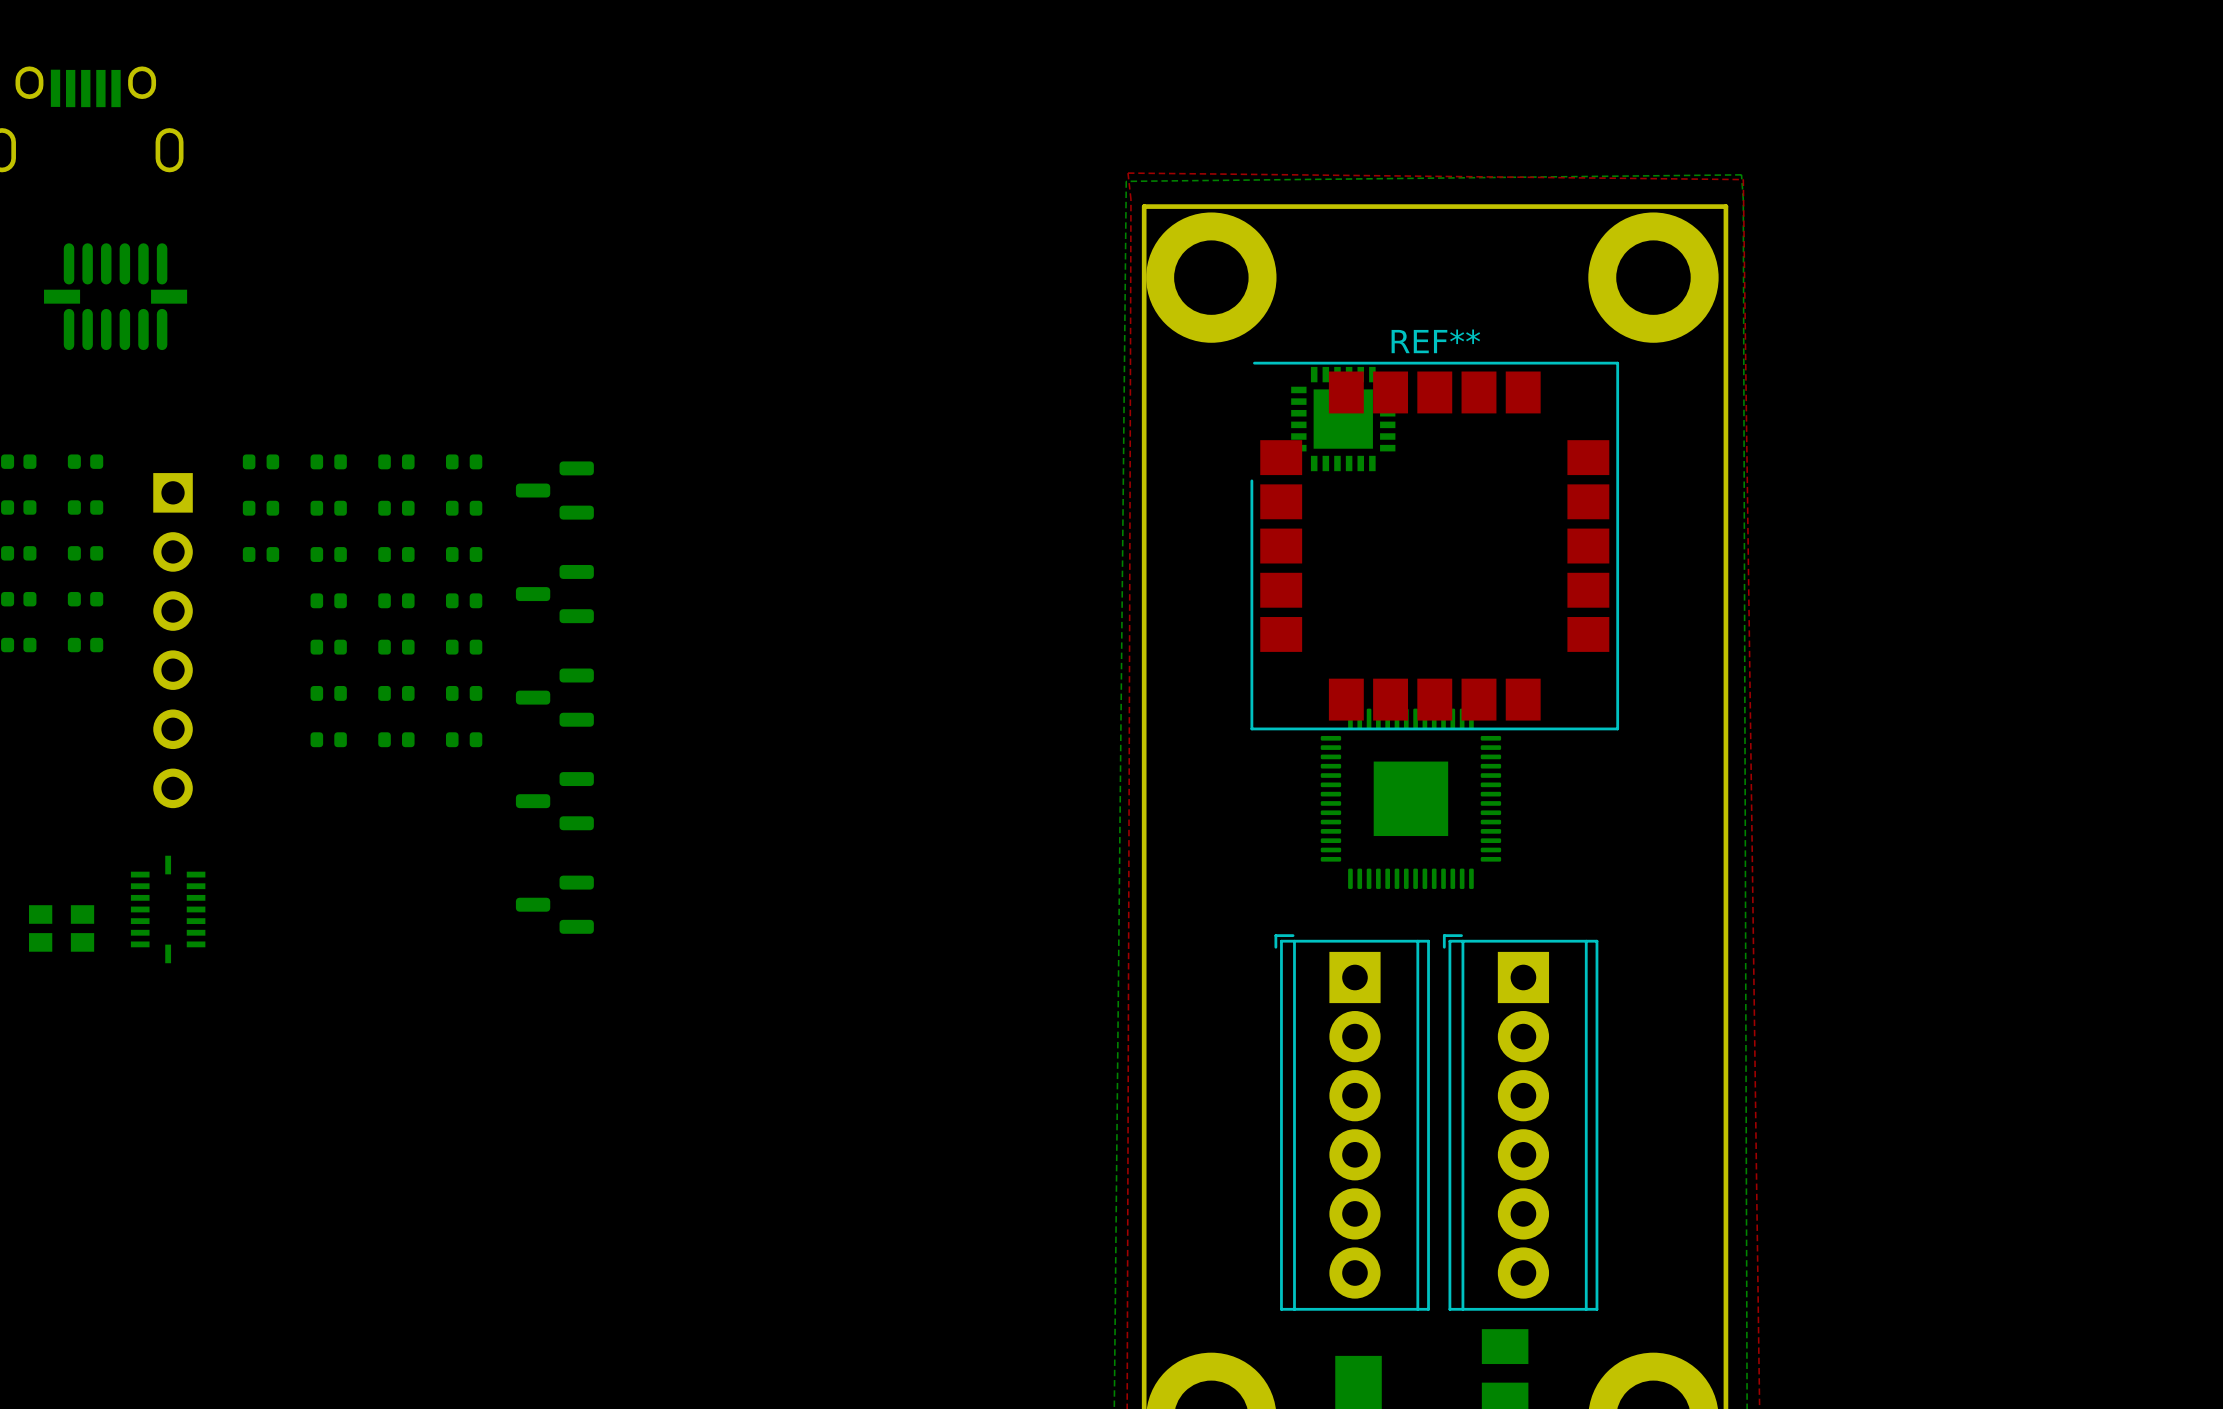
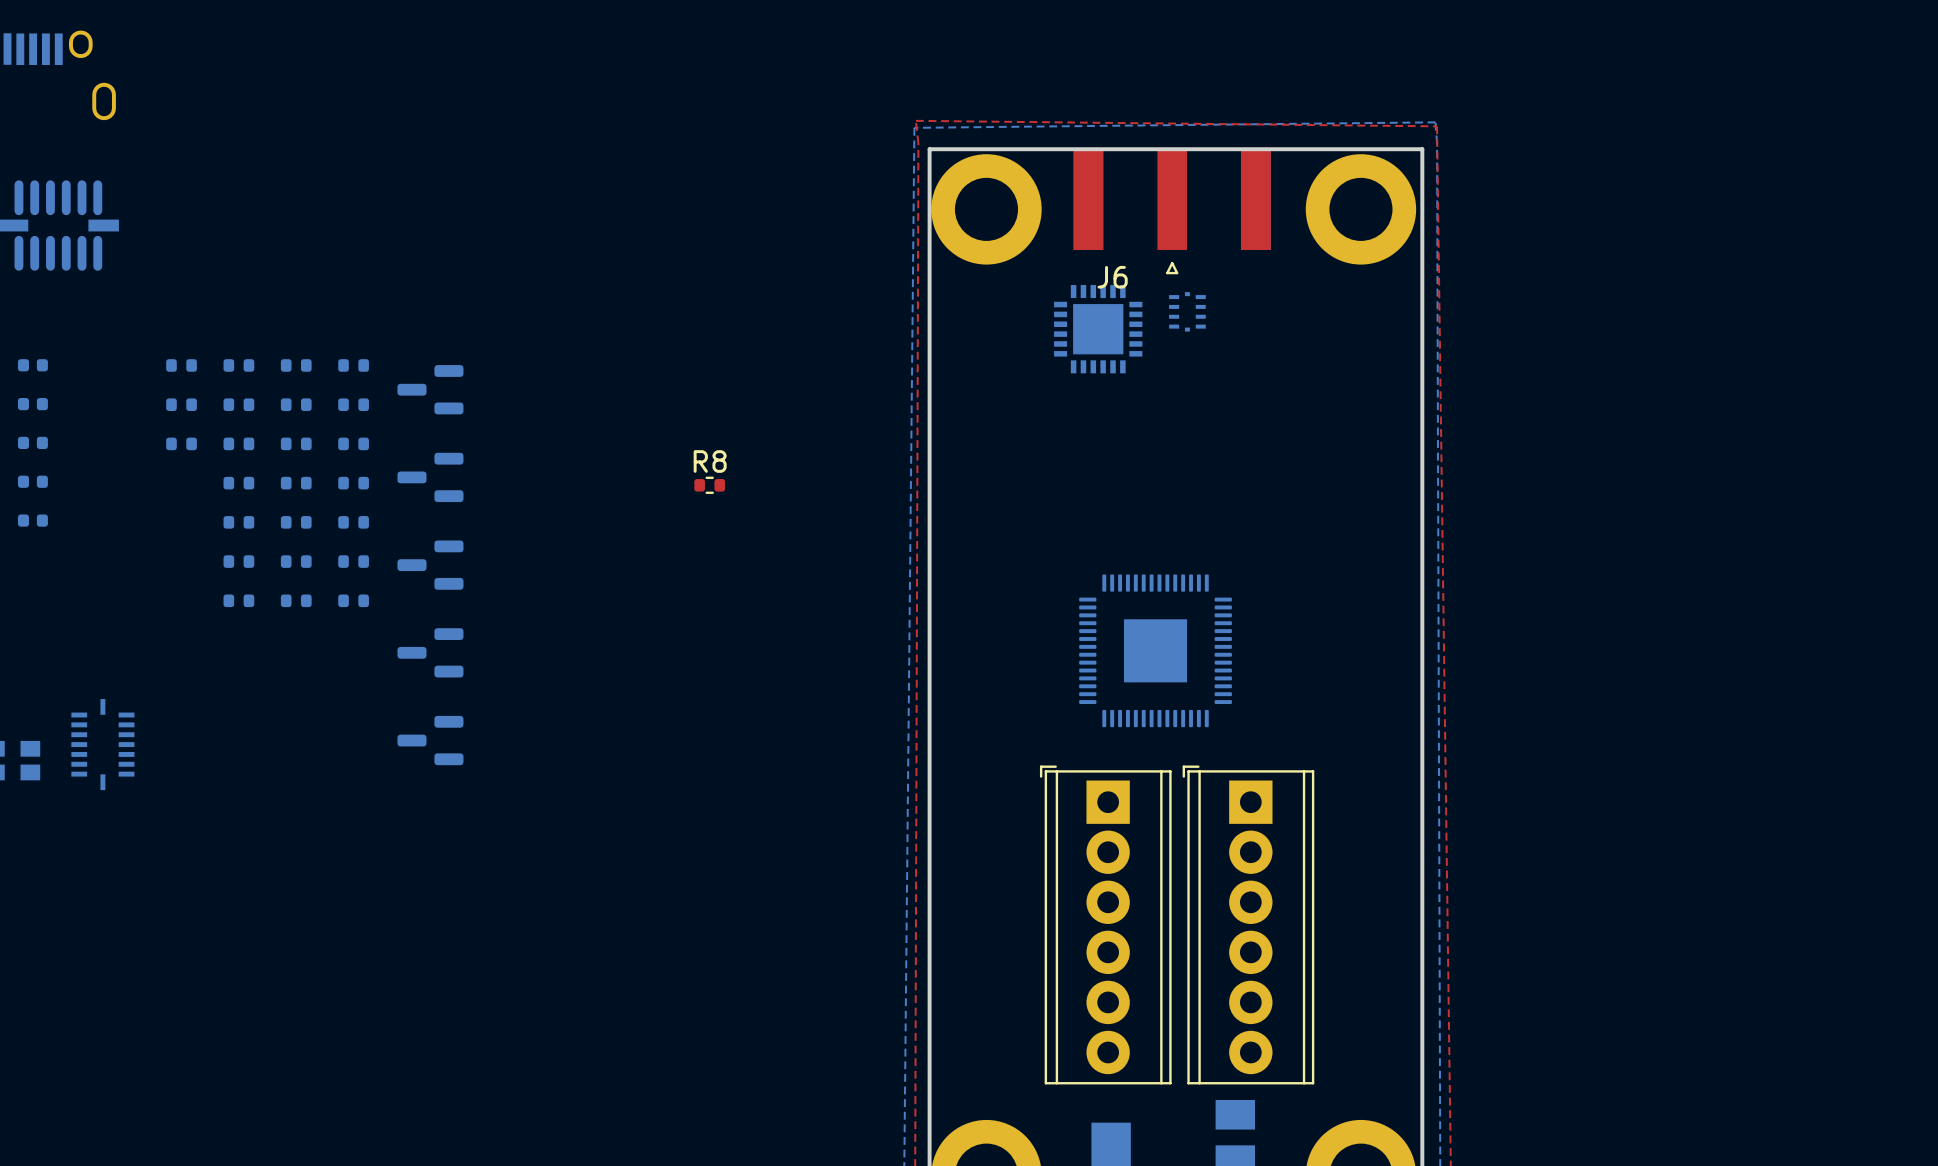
J6: none -> (1172, 212)
part: none -> (1187, 311)
REF**: (1434, 546) -> none
R8: none -> (709, 485)
part: (173, 640) -> none

